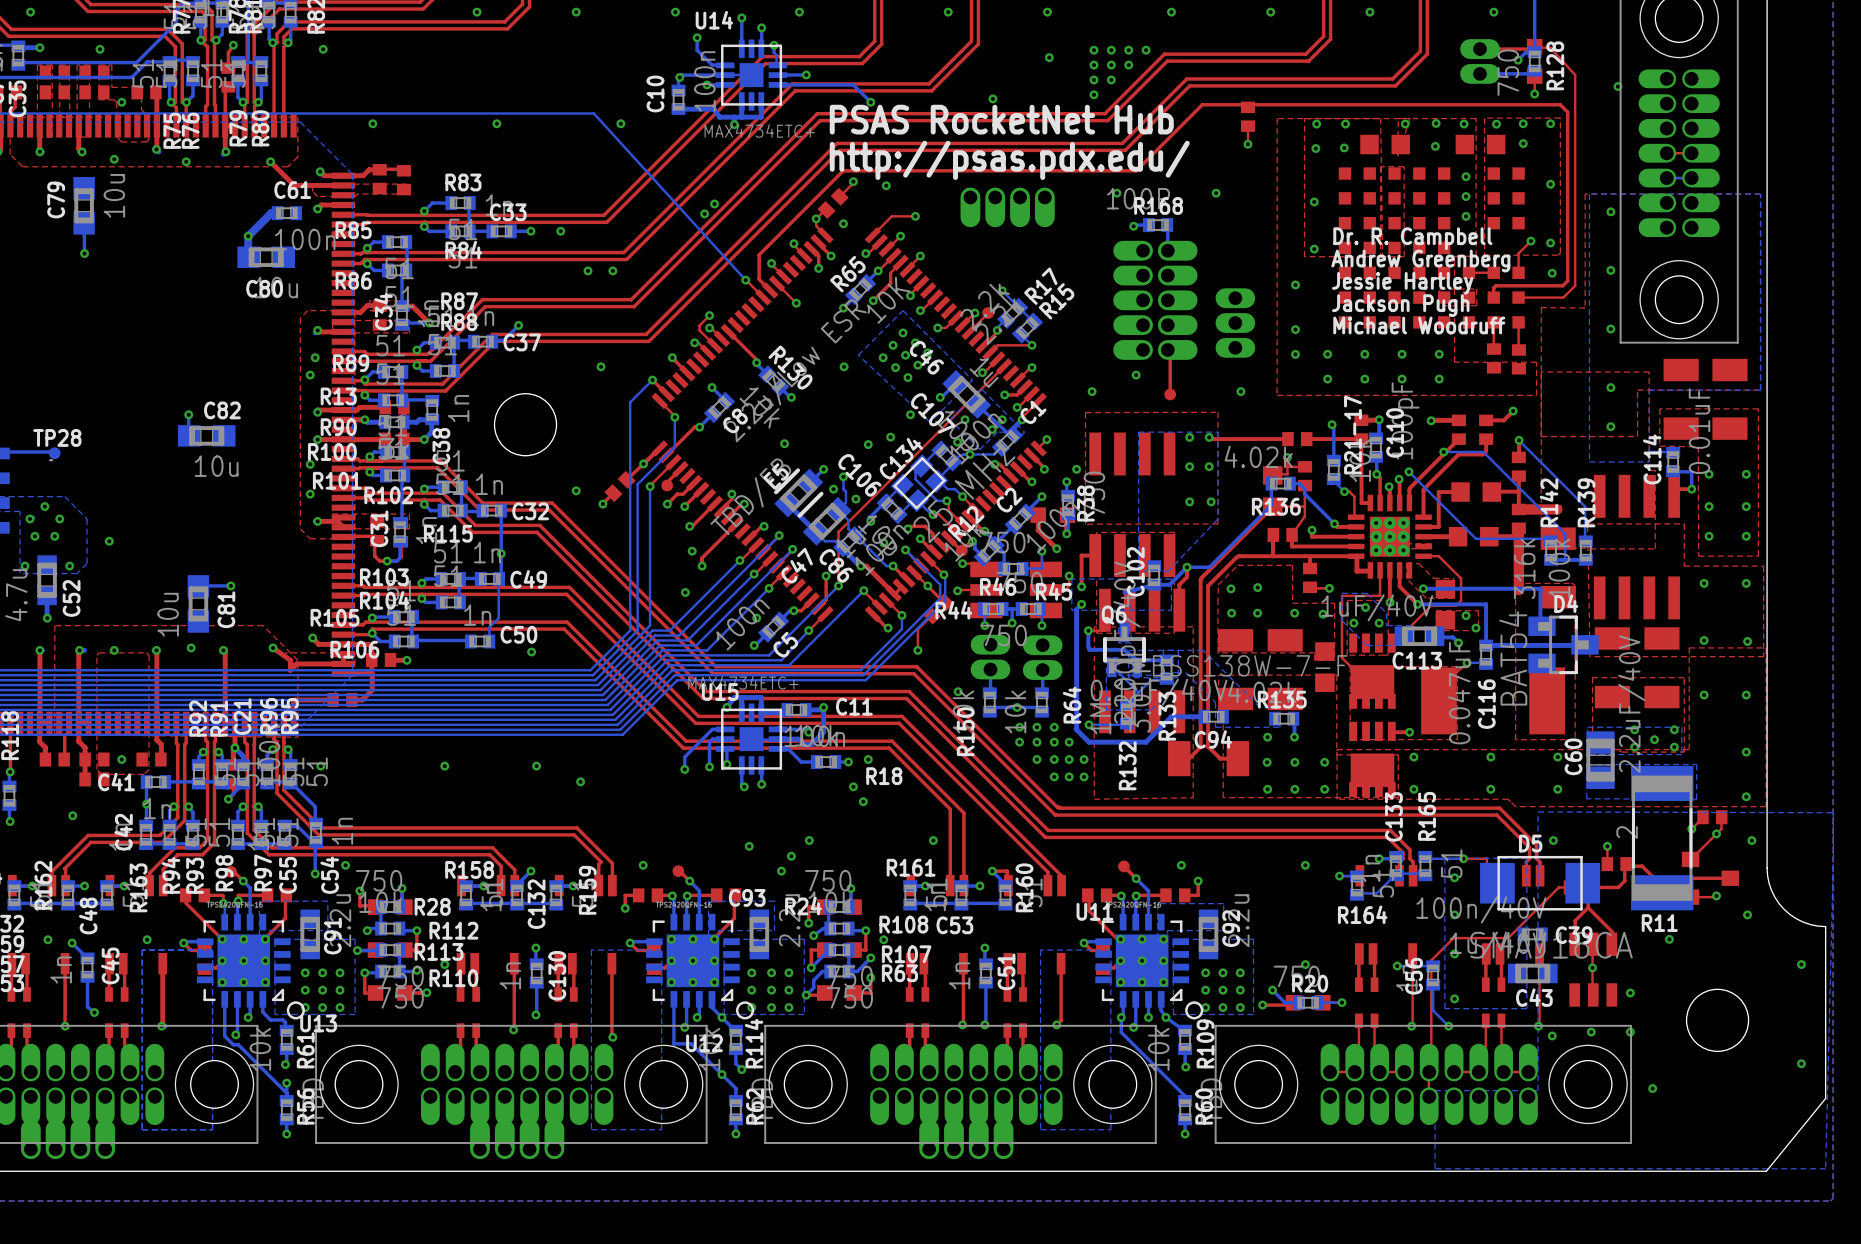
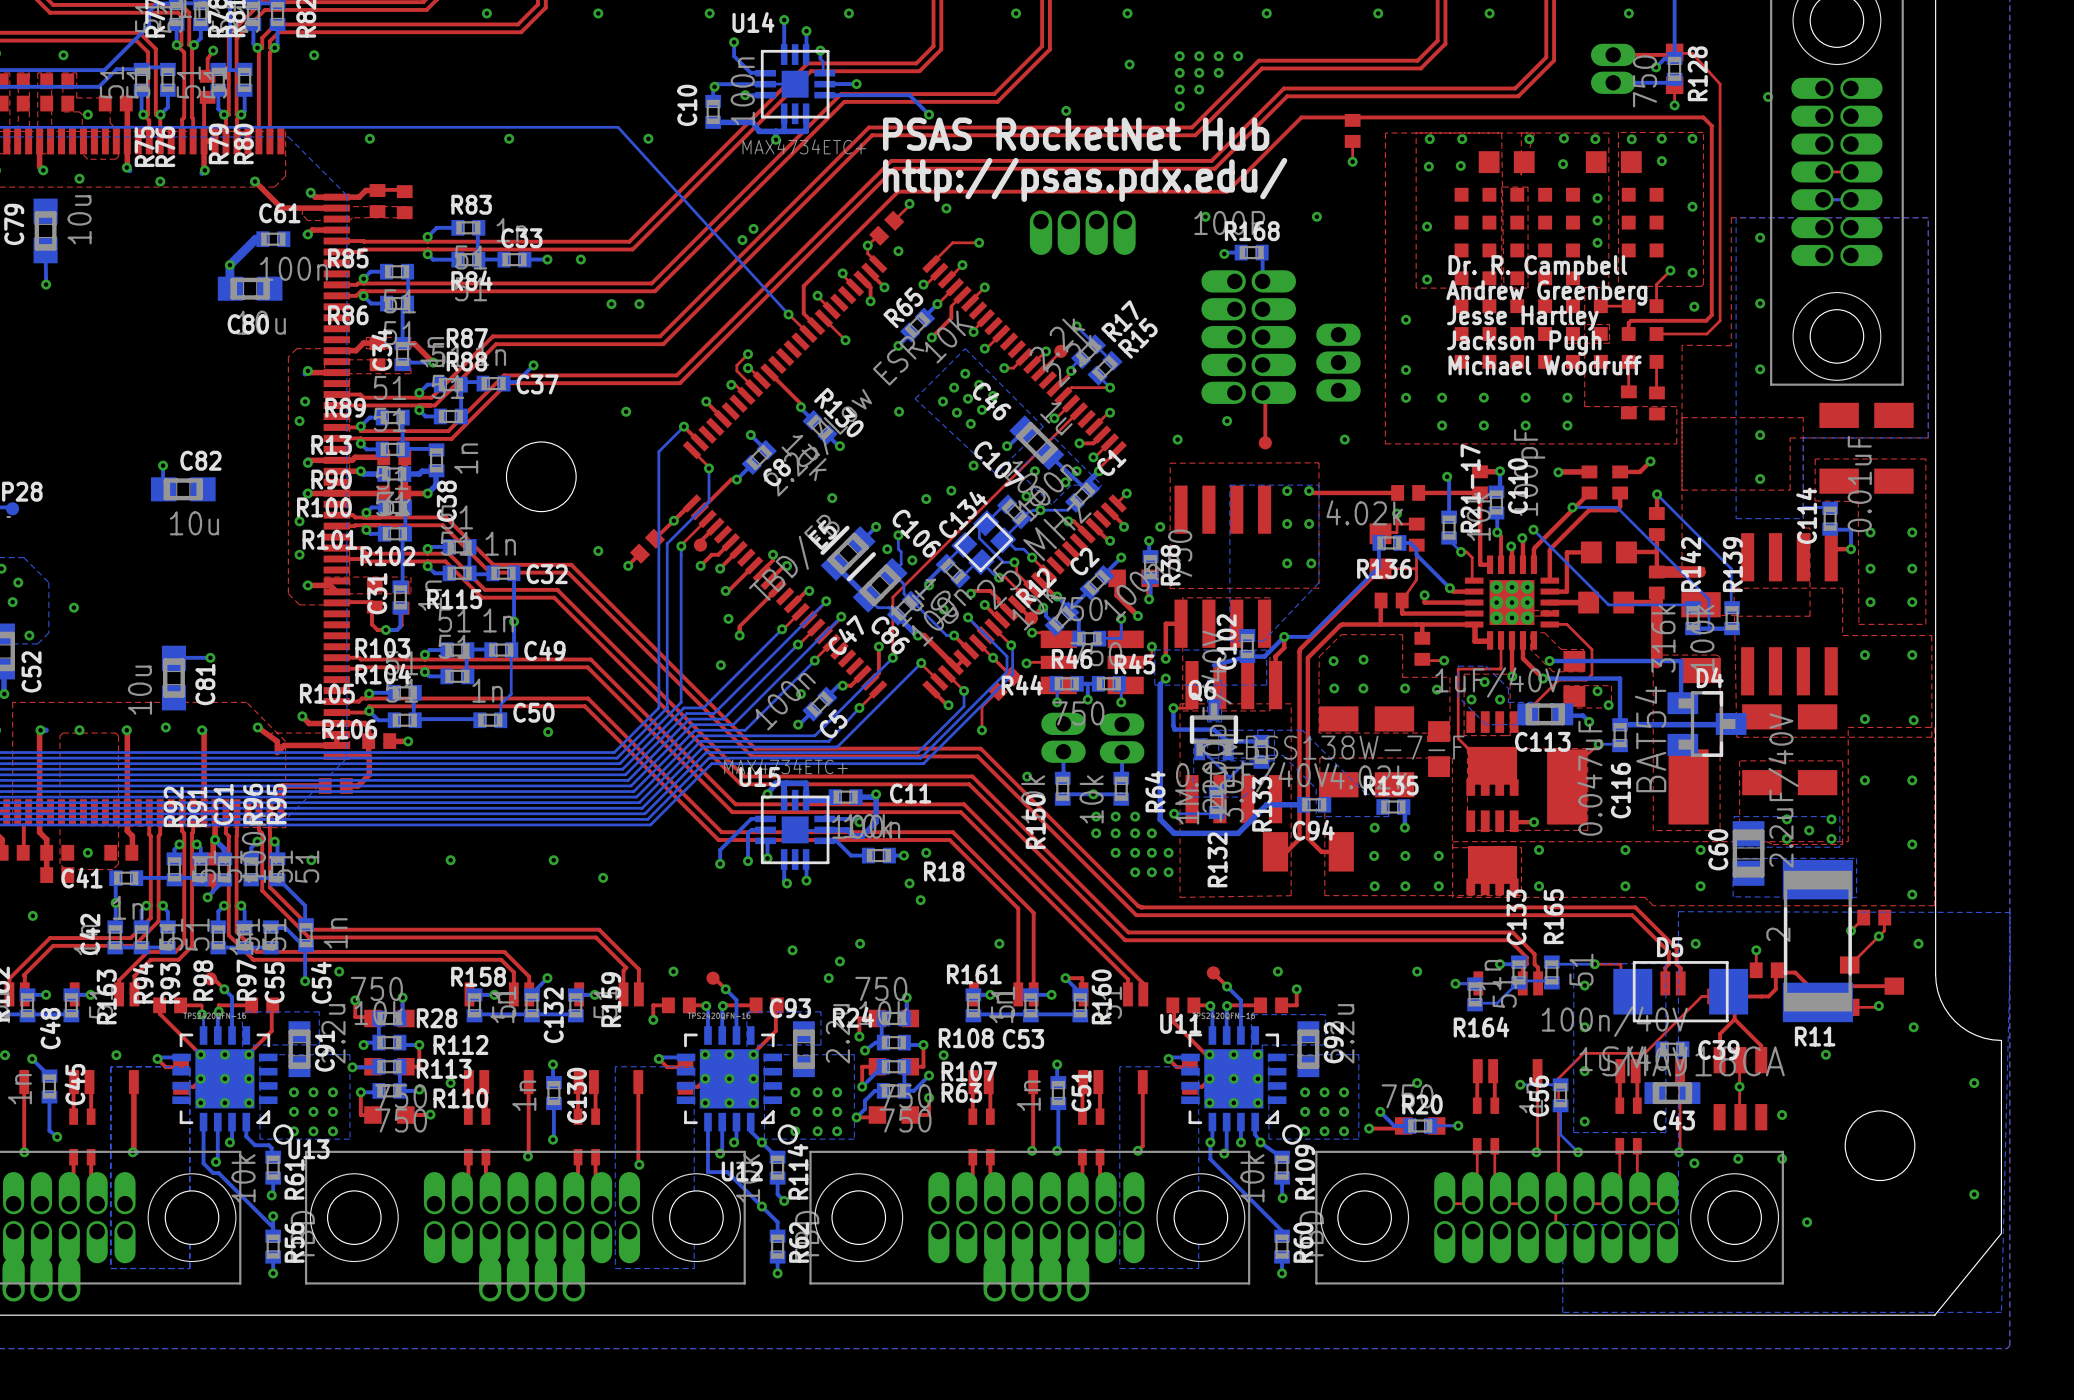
text: Jessie Hartley (1402, 283) -> Jesse Hartley (1522, 318)

